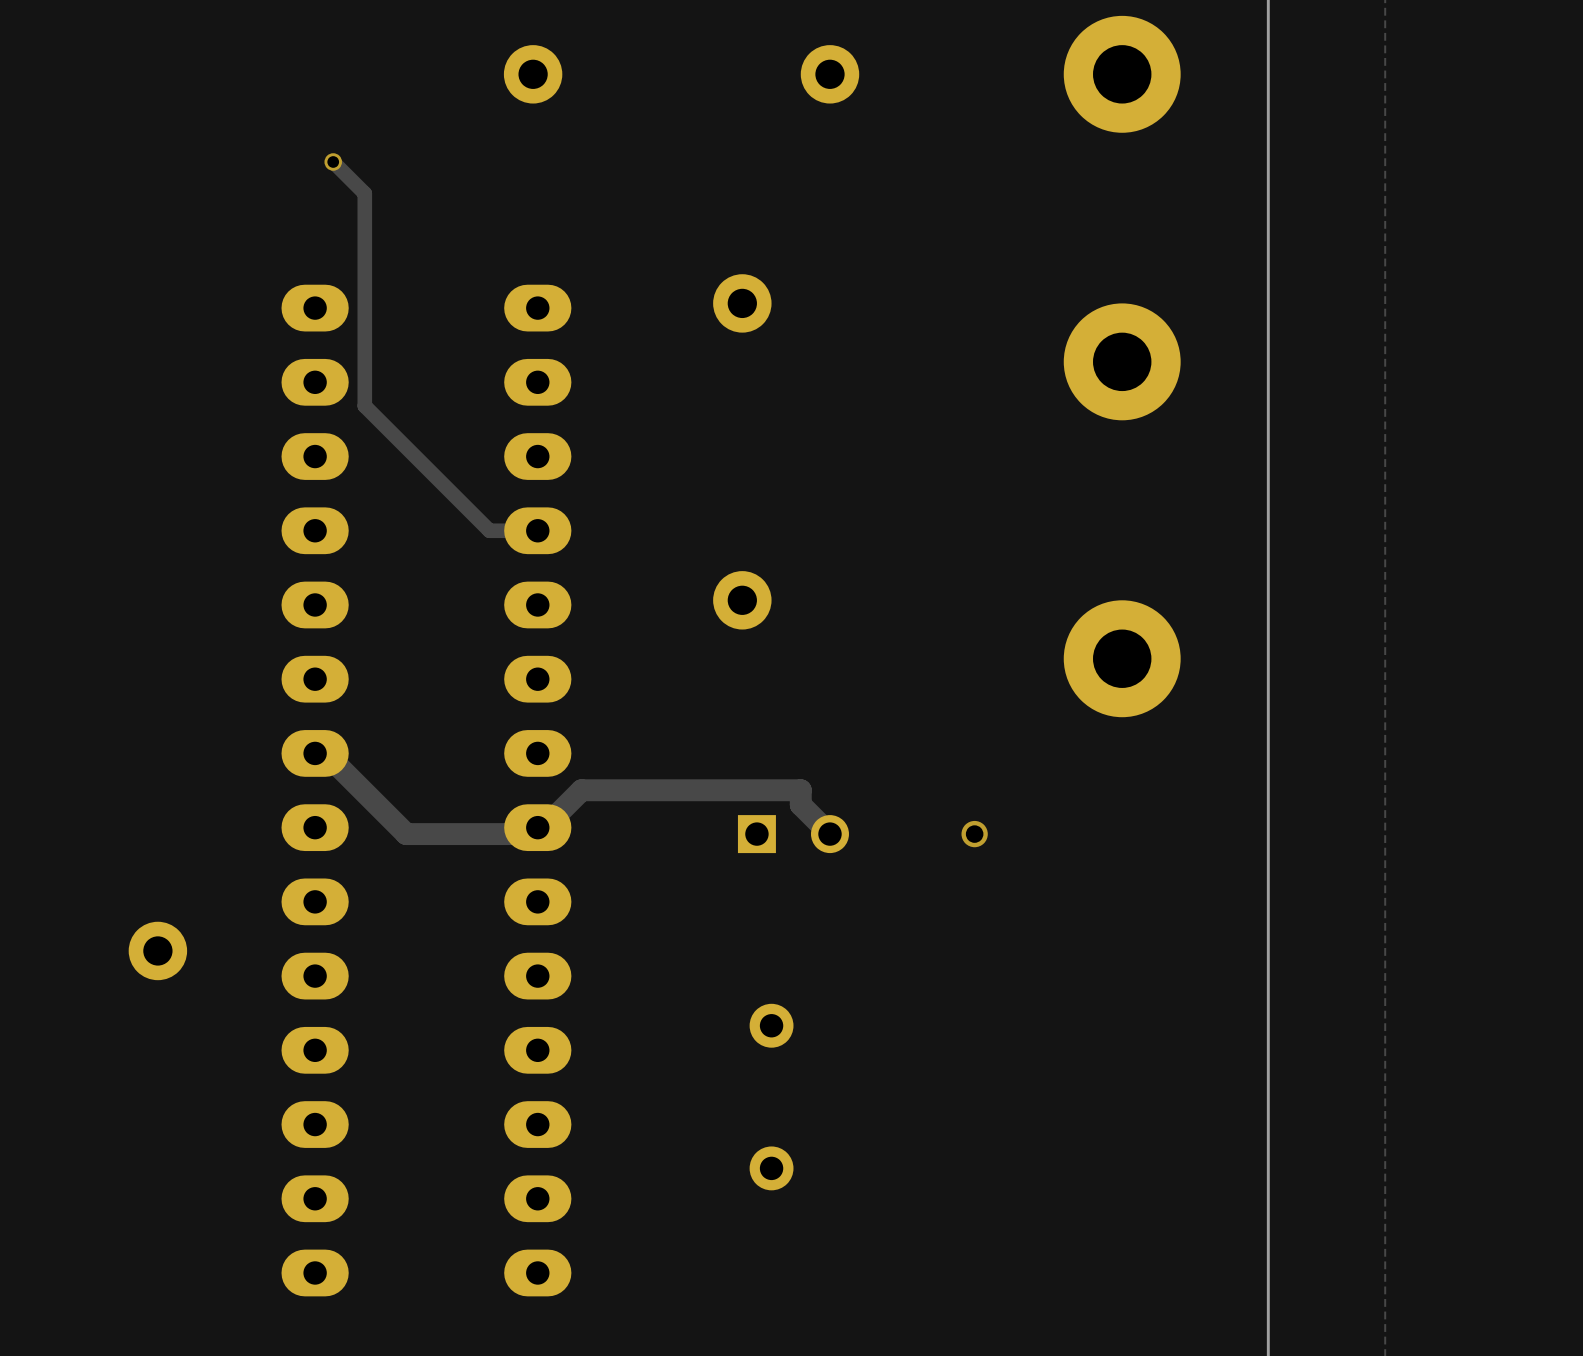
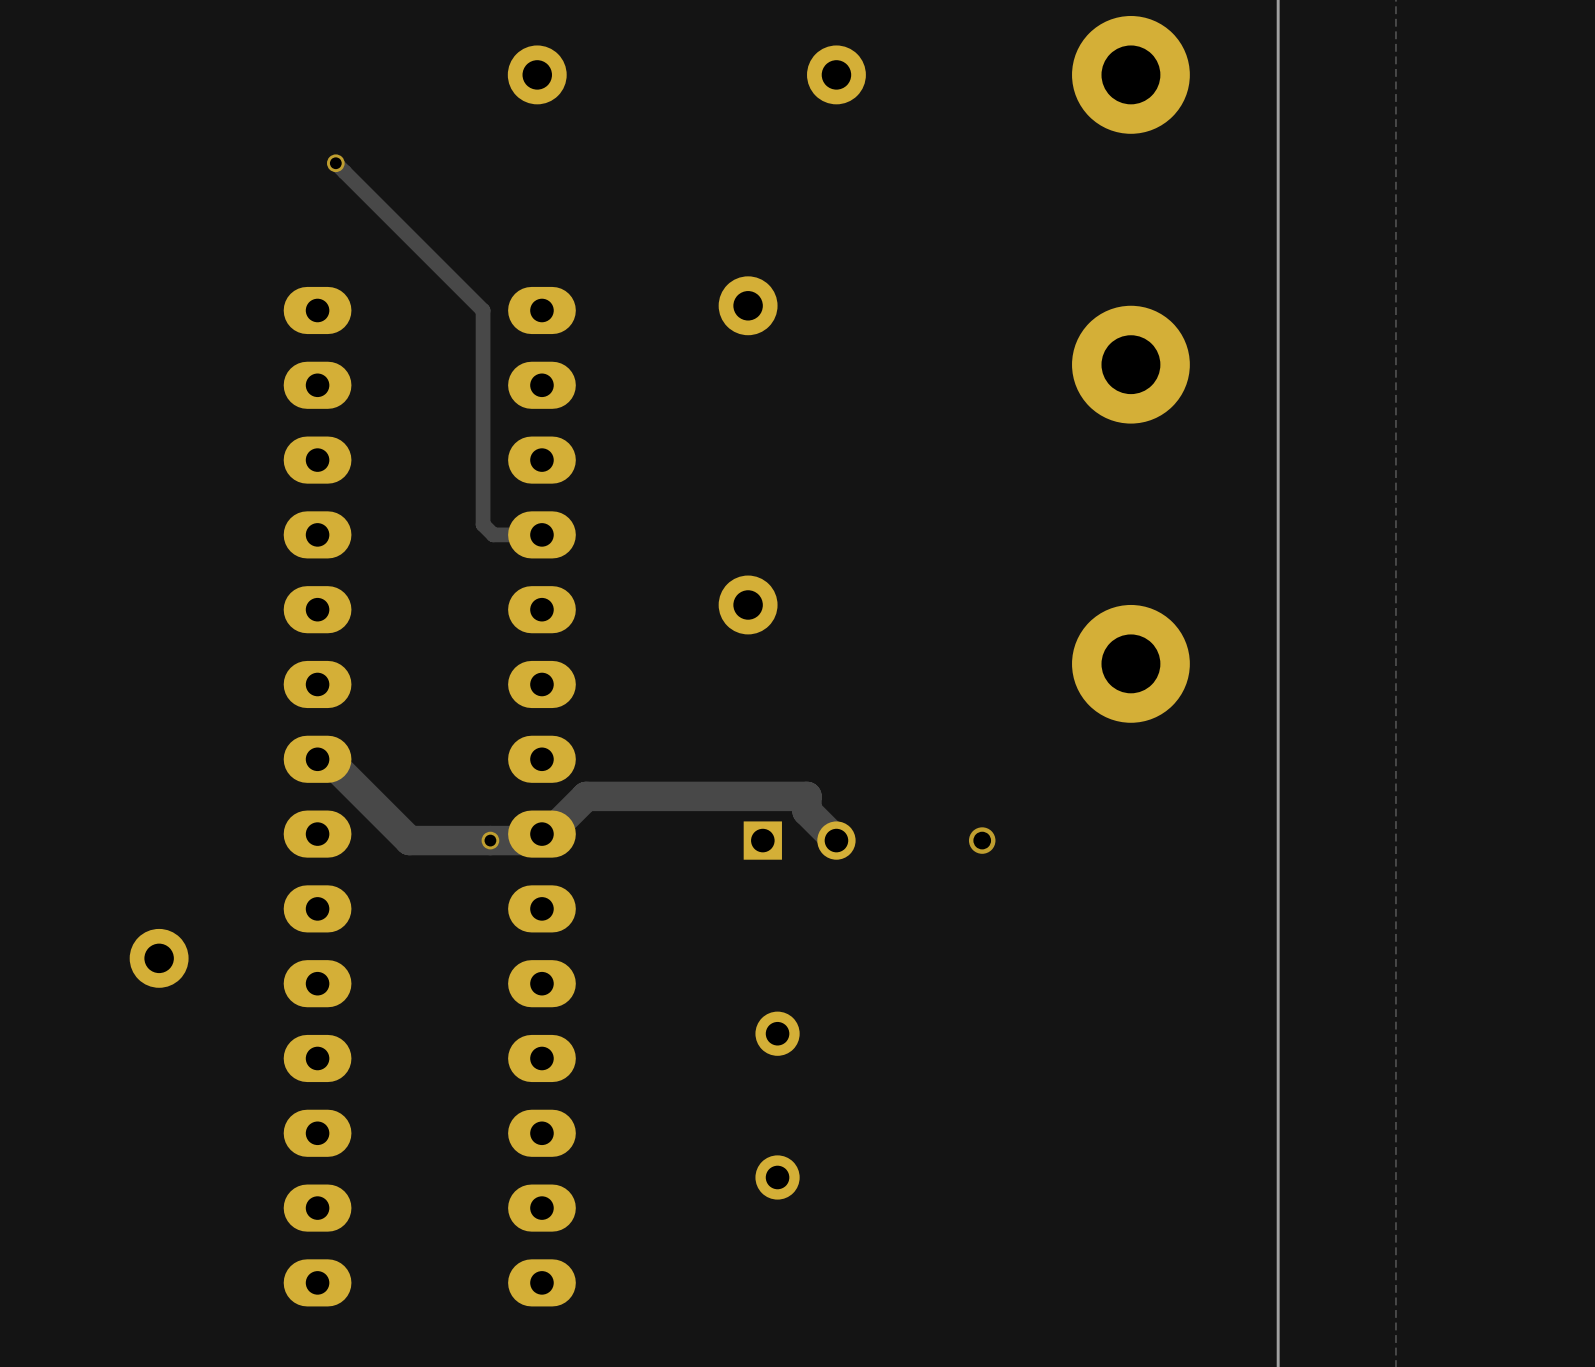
track: (364, 193) (364, 405) (479, 520) -> (367, 195) (483, 310) (483, 524)
track width: thin (318, 746) (406, 834) (537, 834) (581, 790) (800, 790) (800, 804) (829, 834) -> thick (321, 752) (409, 840) (541, 840) (586, 796) (807, 796) (807, 811) (836, 840)
via: none -> (490, 840)

